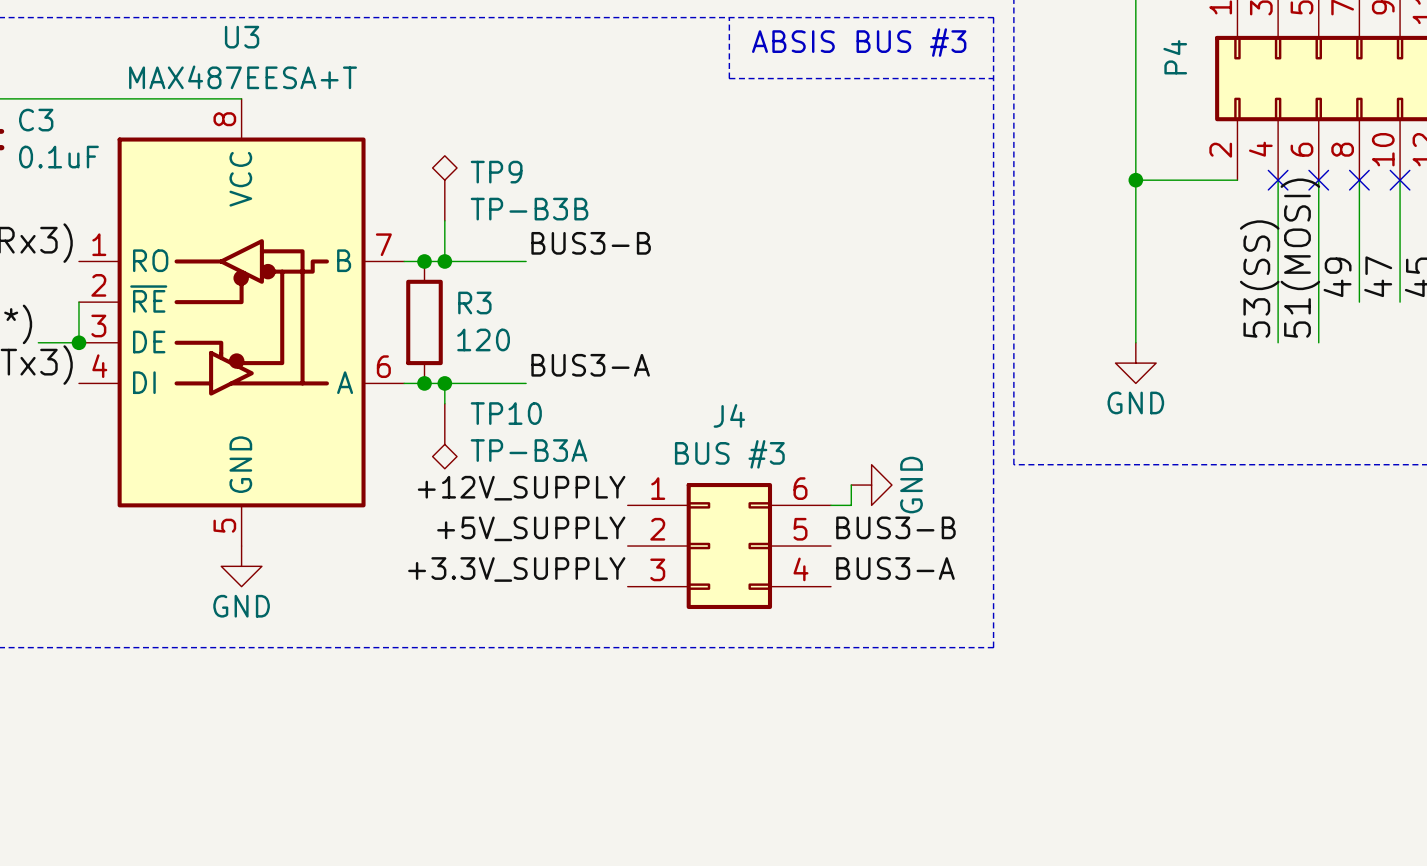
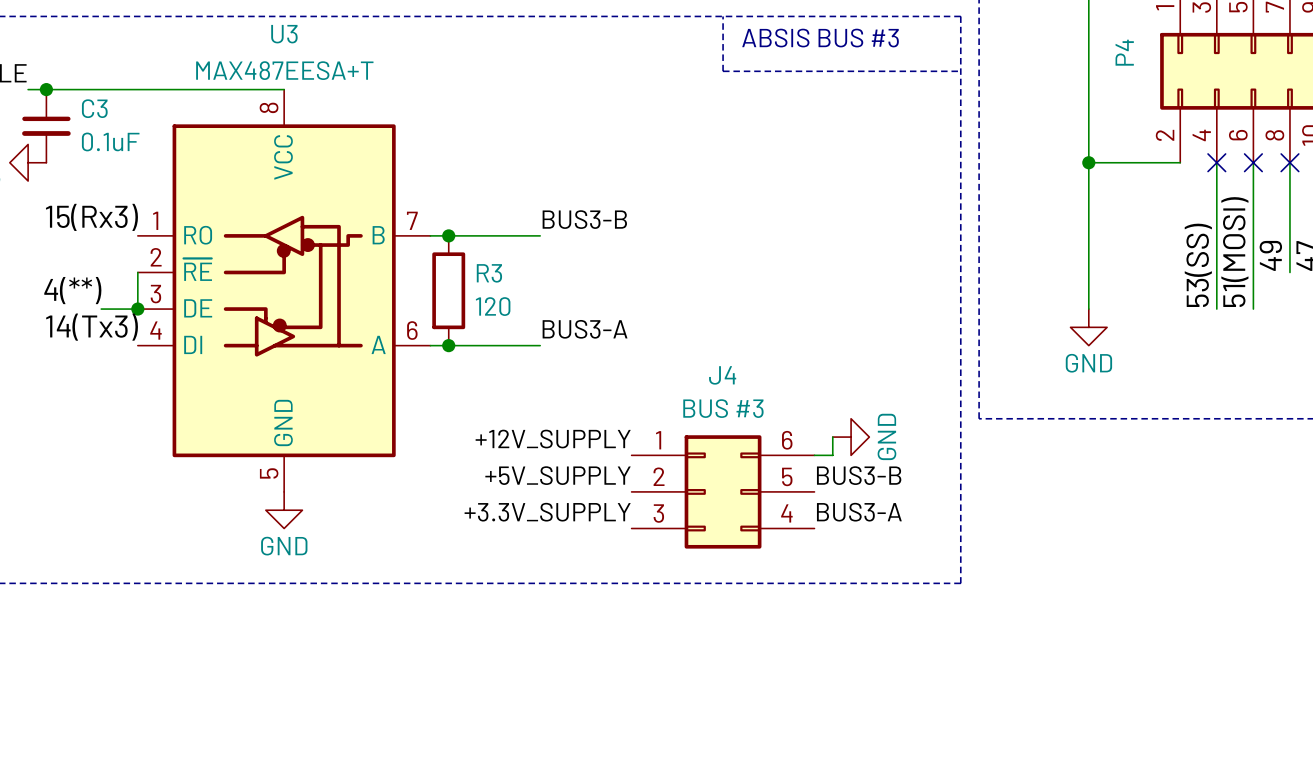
TP9: TP-B3B (444, 188) -> none
wire: (444, 220) (444, 261) -> none
junction: (444, 261) -> none
wire: (444, 383) (444, 403) -> none
junction: (444, 383) -> none
TP10: TP-B3A (444, 436) -> none

